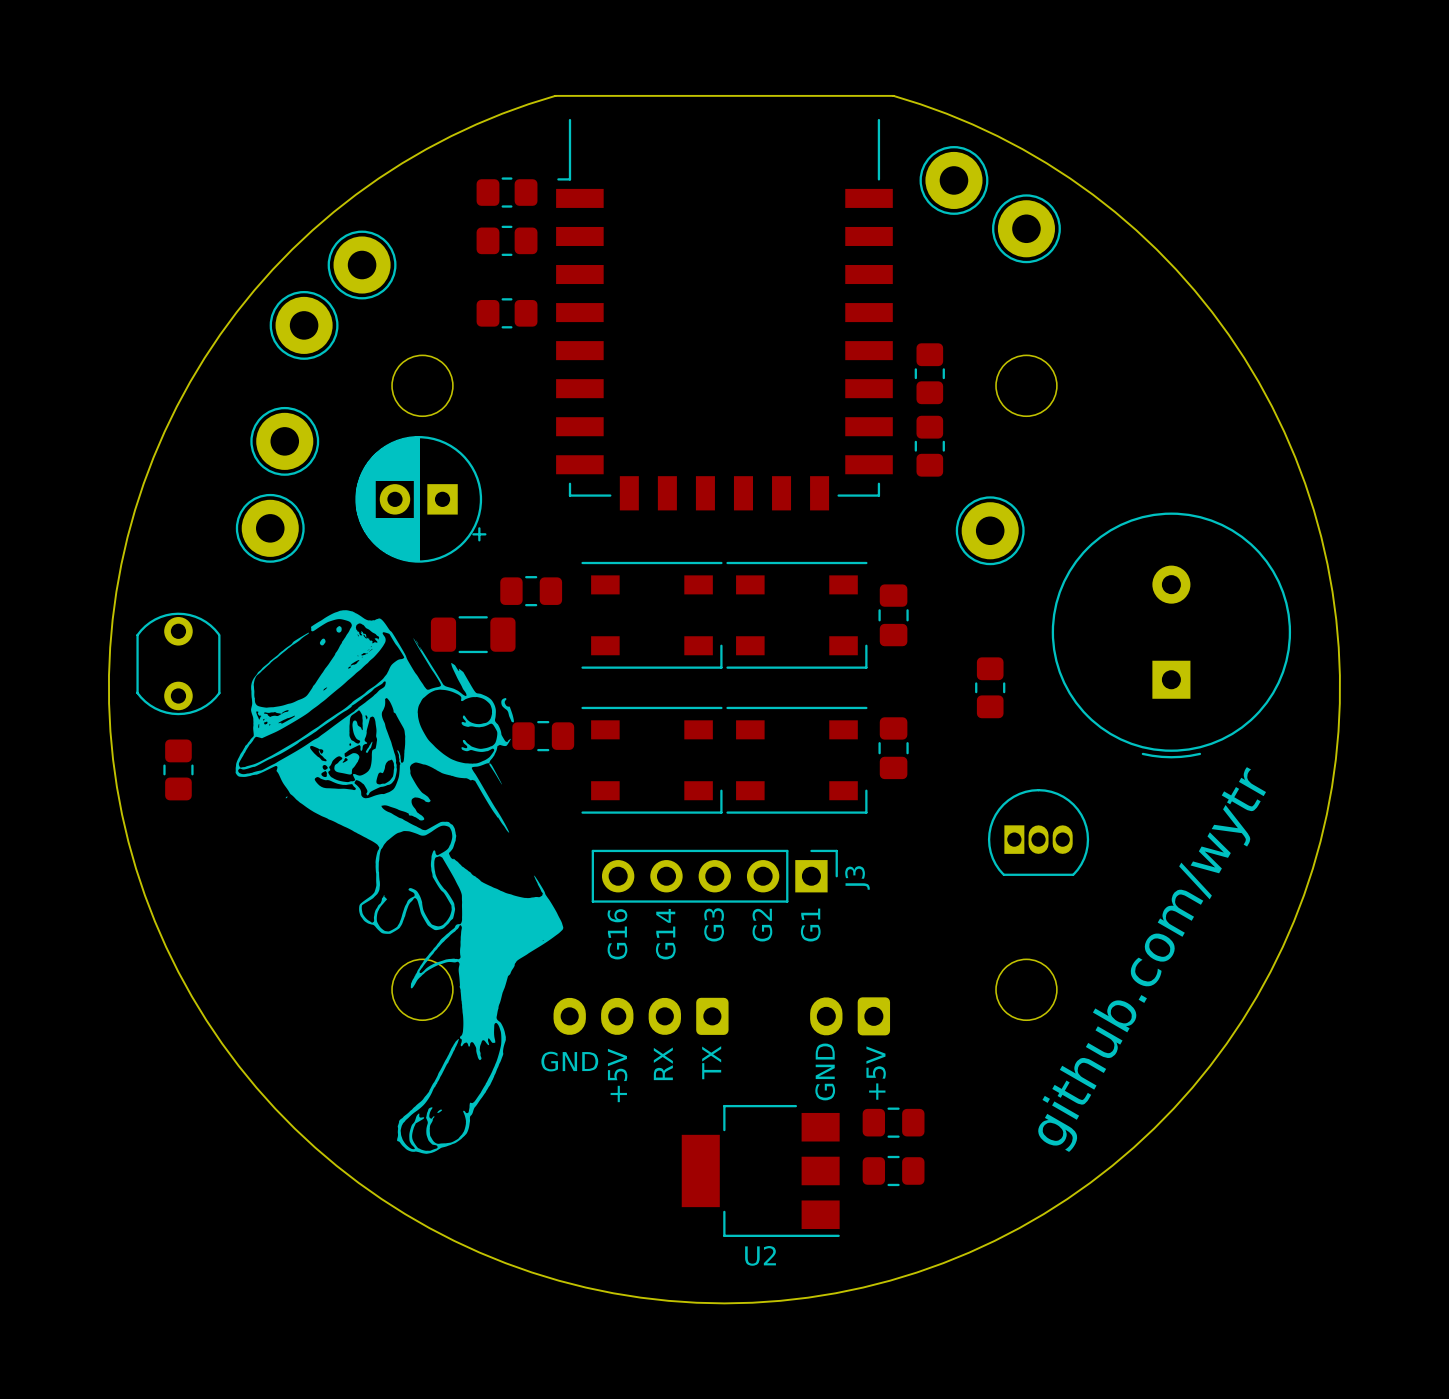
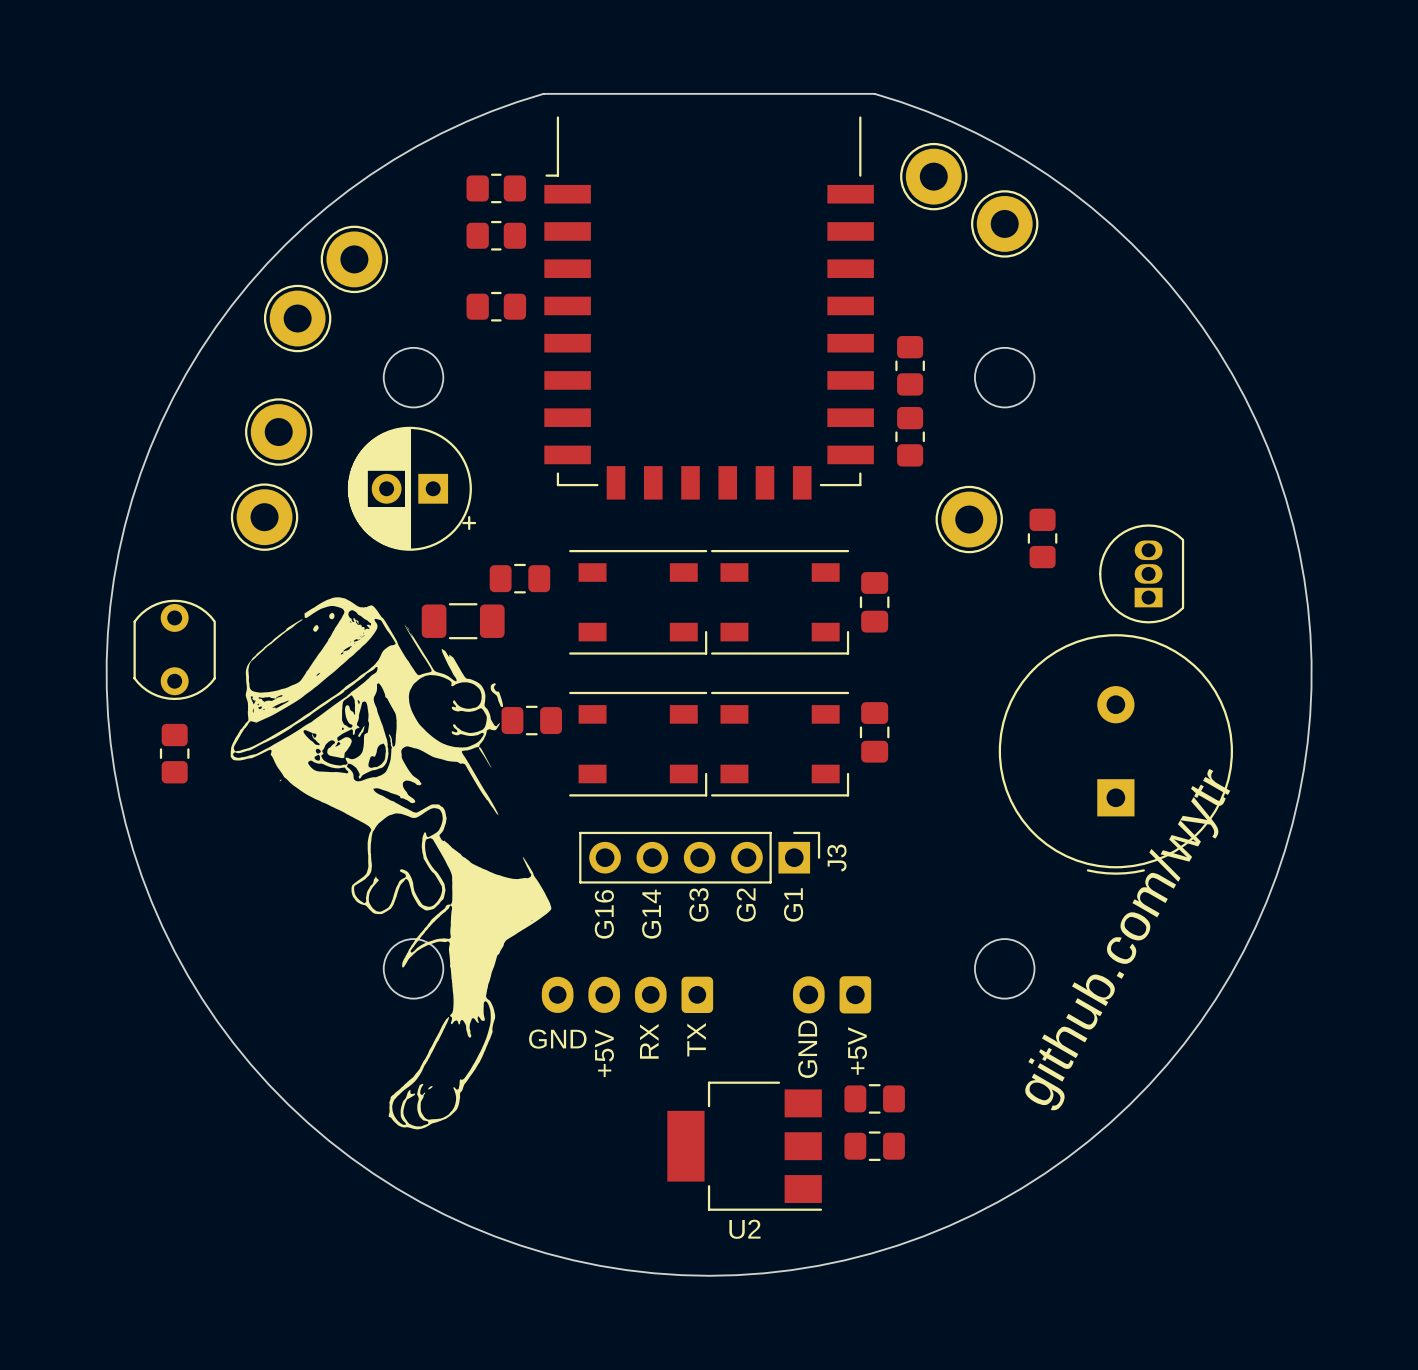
part position: (1171, 635) -> (1115, 754)
part position: (990, 687) -> (1042, 538)
part rotation: 0° (1038, 832) -> 90° counterclockwise (1141, 573)
part position: (1038, 832) -> (1141, 573)

